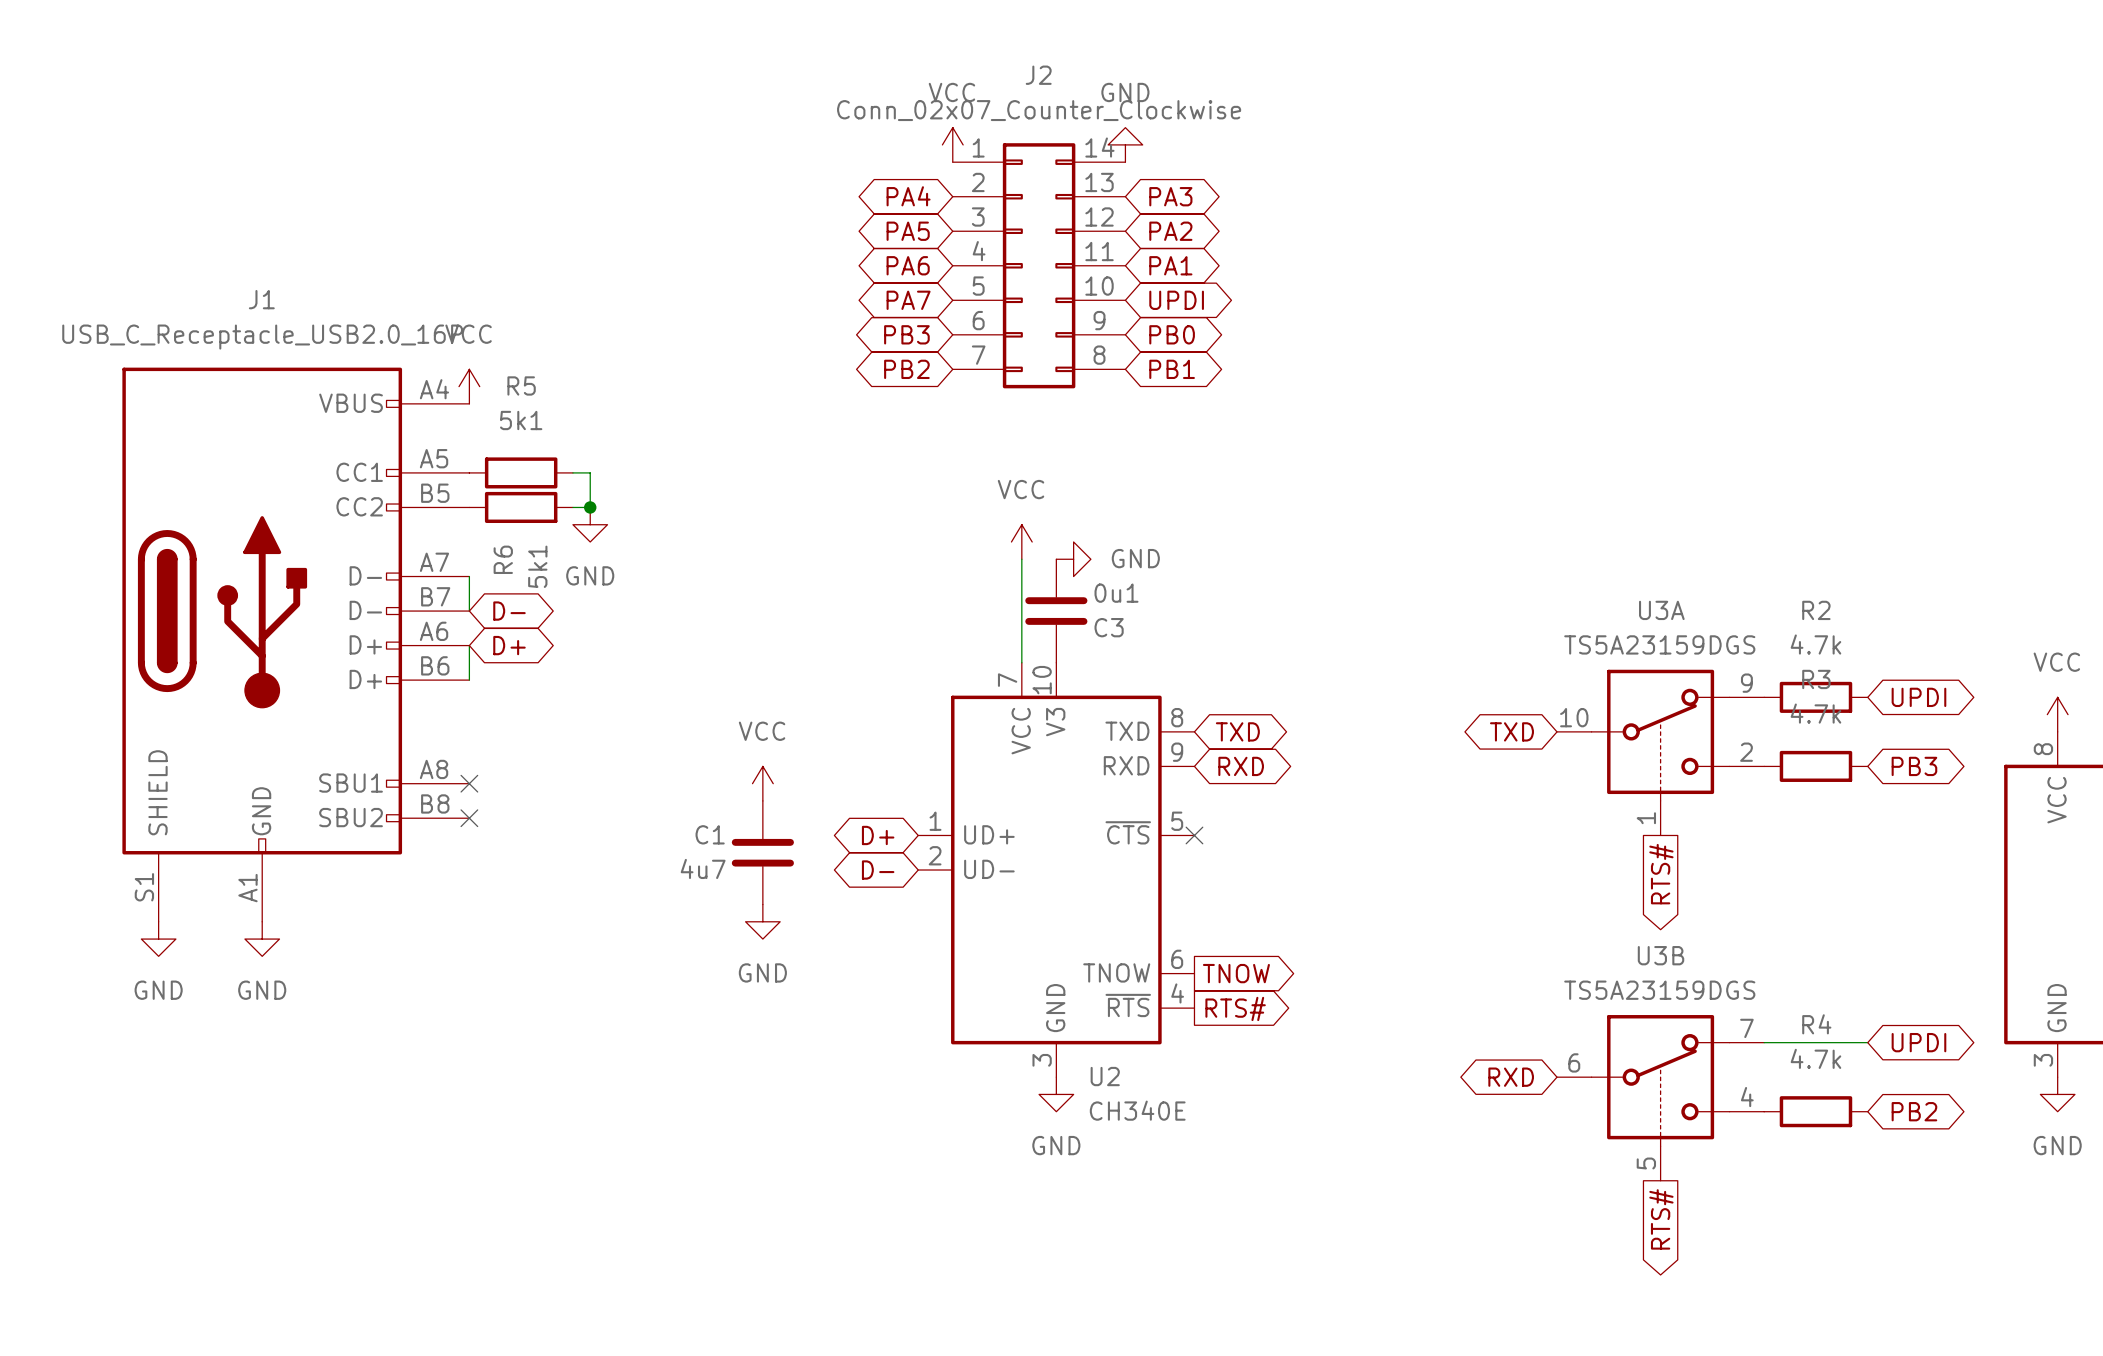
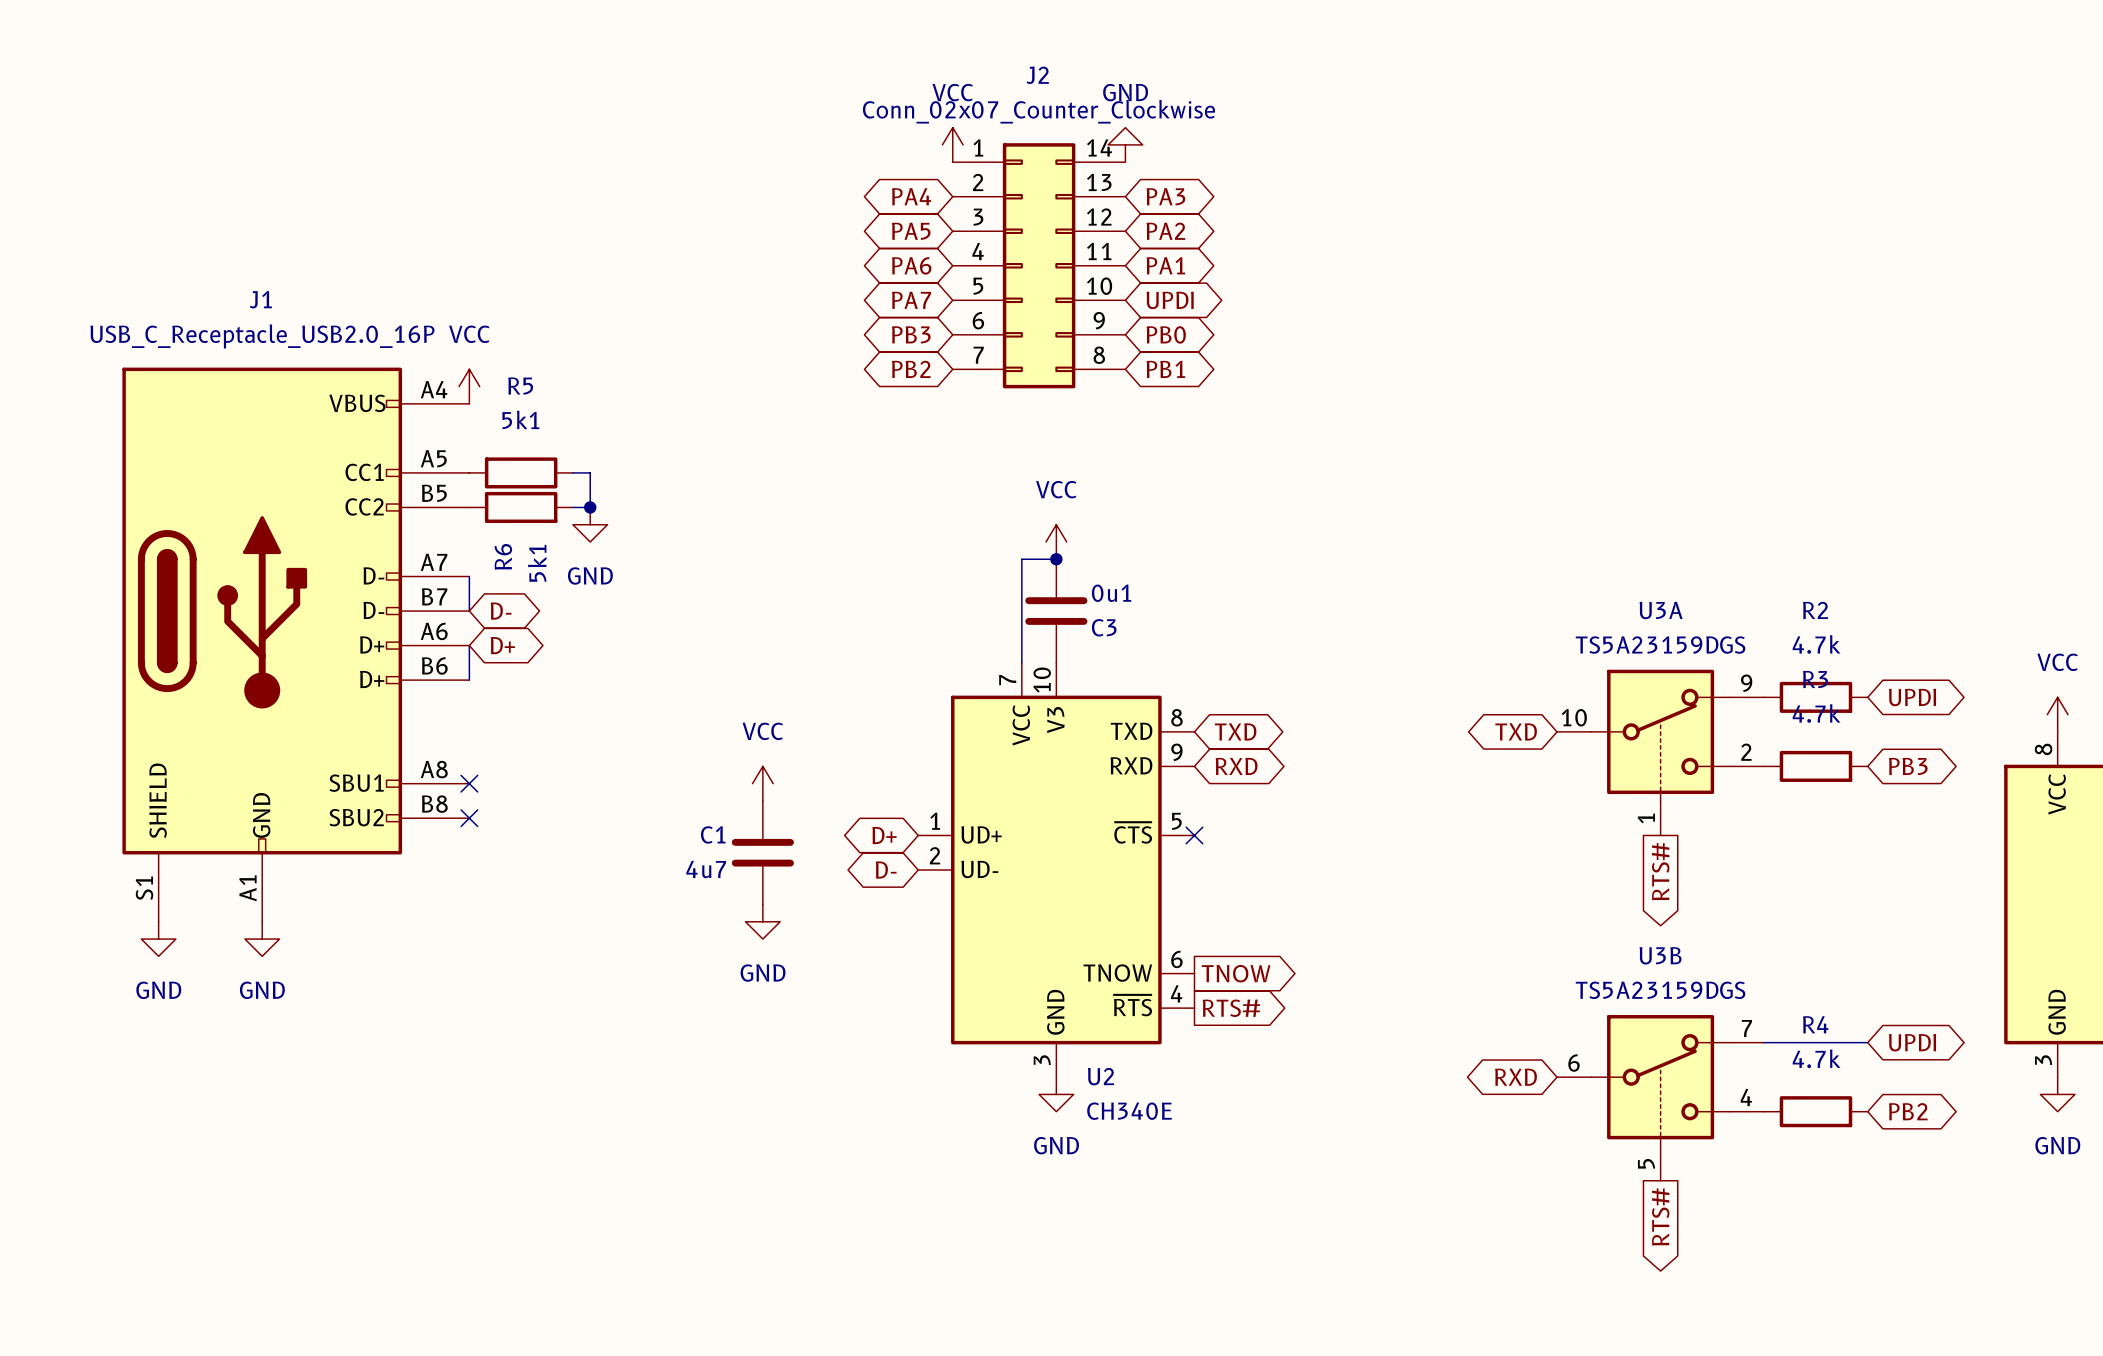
power symbol position: VCC (1021, 541) -> VCC (1056, 541)
wire: none -> (1021, 559) (1056, 559)
junction: none -> (1056, 559)
power symbol: GND (1073, 559) -> none

